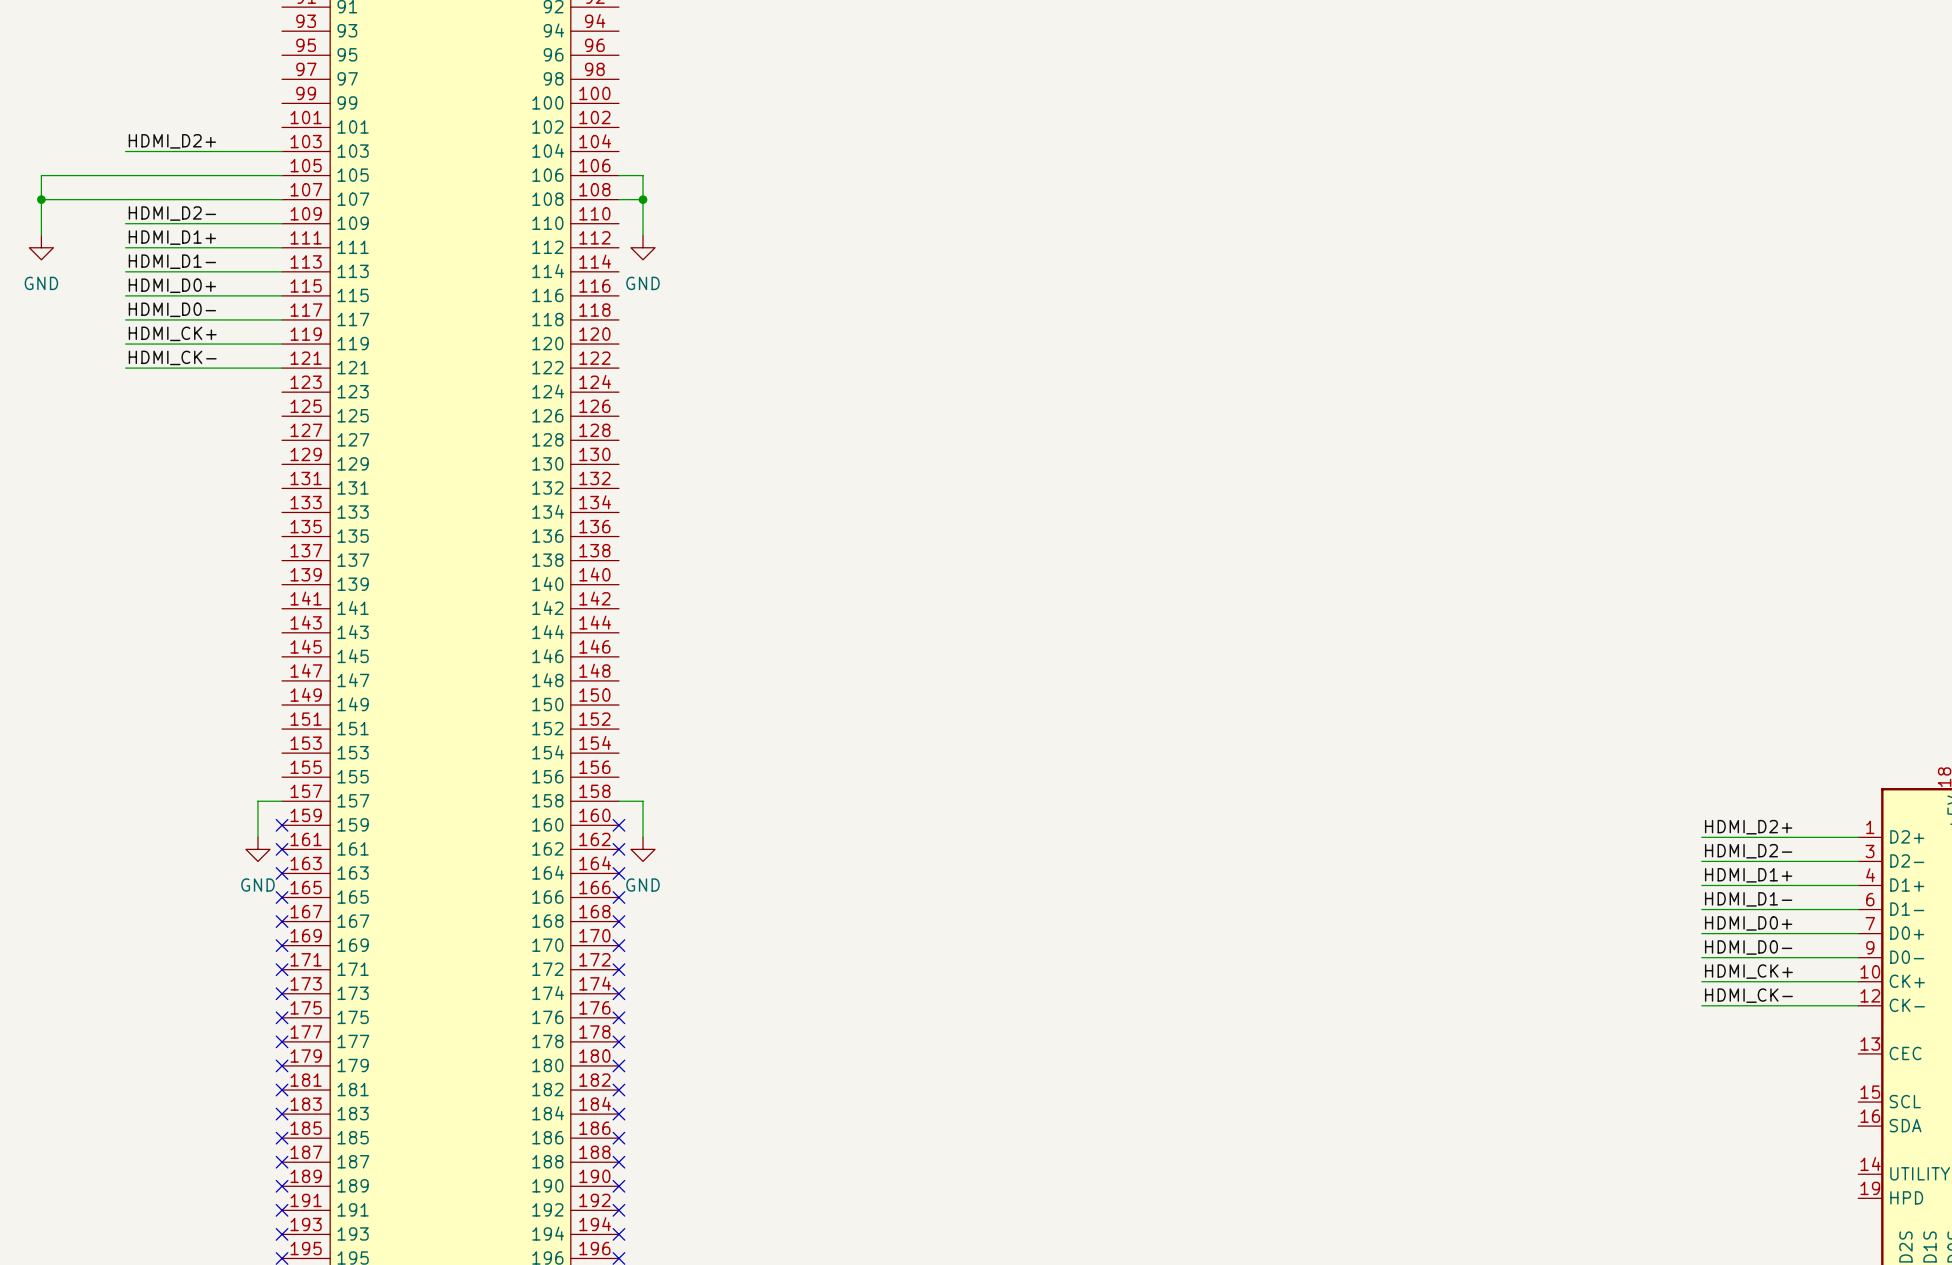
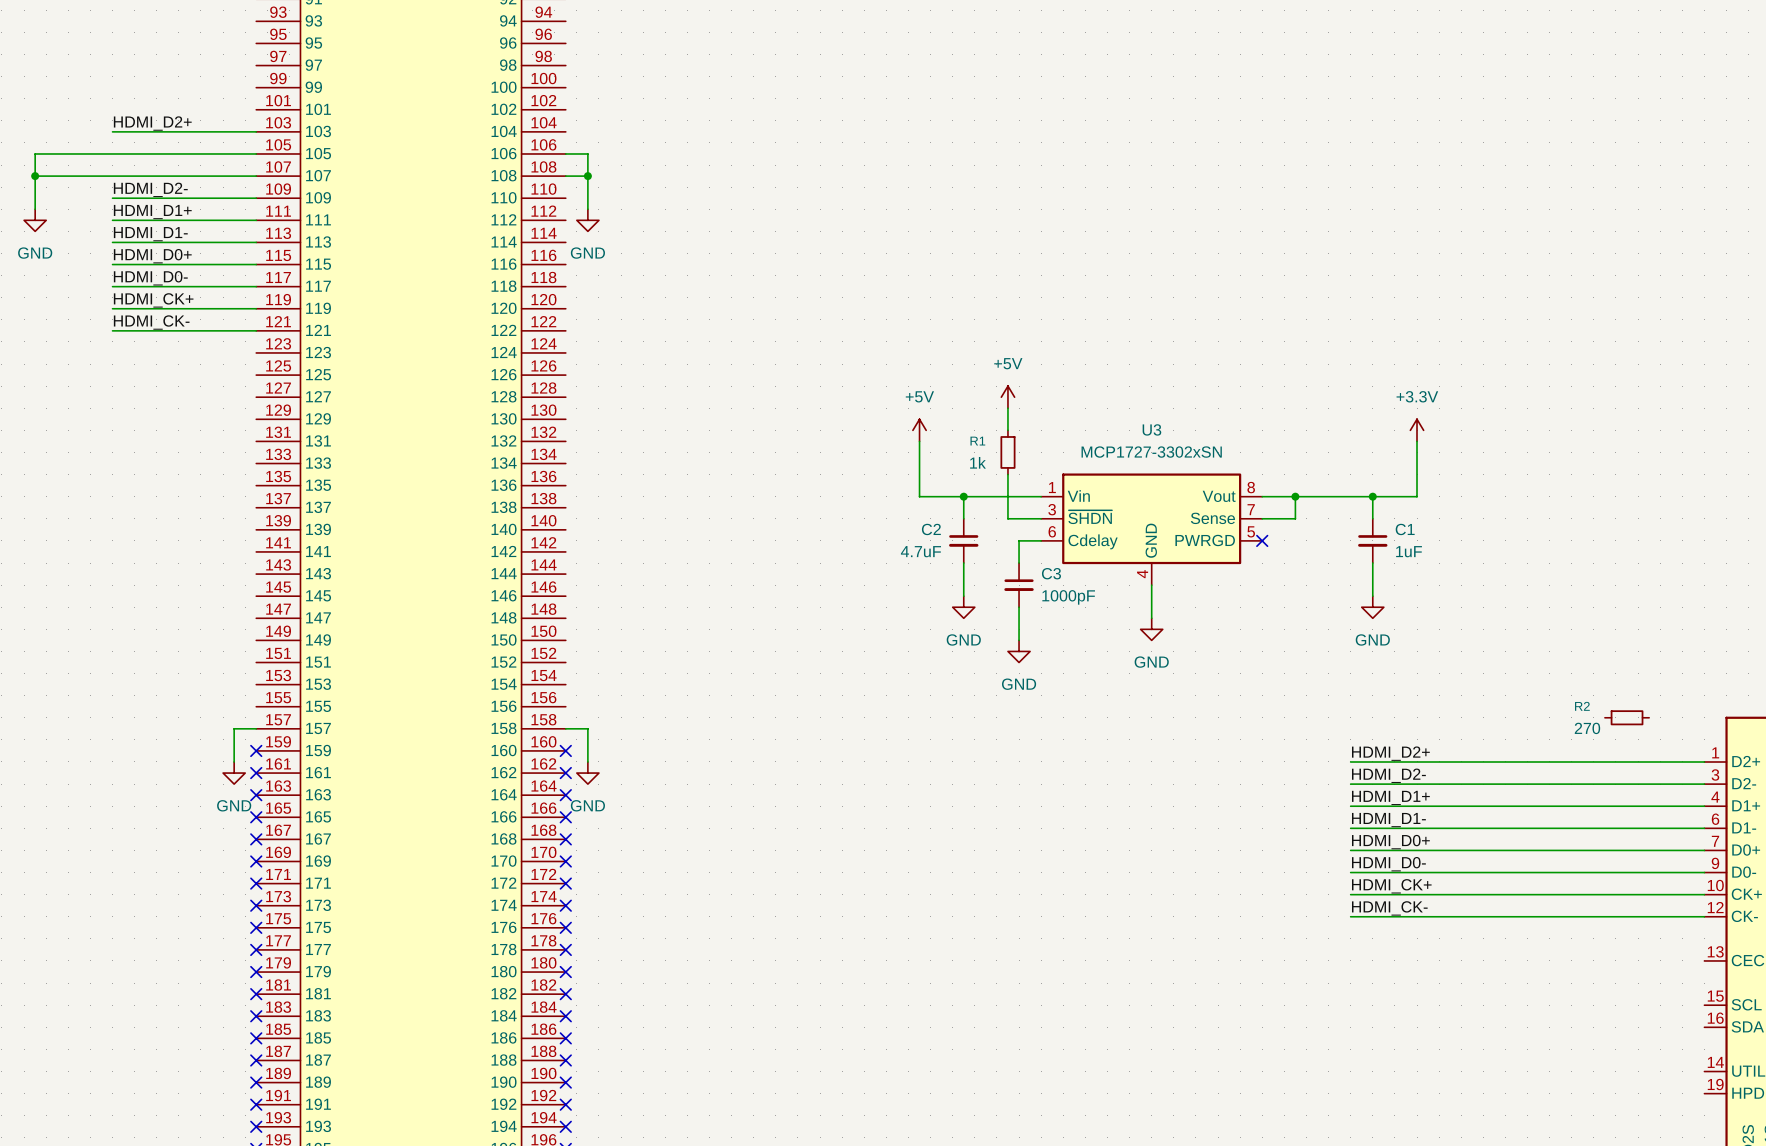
power symbol: none -> +5V (1007, 397)
wire: none -> (1007, 408) (1007, 430)
power symbol: none -> +5V (919, 430)
power symbol: none -> +3.3V (1417, 430)
wire: none -> (919, 441) (919, 496) (1041, 496)
wire: none -> (1417, 441) (1417, 496) (1262, 496)
R1: none -> 1k (1007, 452)
wire: none -> (1007, 474) (1007, 518) (1041, 518)
wire: none -> (963, 496) (963, 518)
junction: none -> (963, 496)
wire: none -> (1295, 496) (1295, 518) (1262, 518)
junction: none -> (1295, 496)
wire: none -> (1372, 496) (1372, 518)
junction: none -> (1372, 496)
U3: none -> MCP1727-3302xSN (1151, 529)
C2: none -> 4.7uF (963, 540)
wire: none -> (1041, 540) (1019, 540) (1019, 563)
no-connect mark: none -> (1262, 540)
C1: none -> 1uF (1372, 540)
wire: none -> (963, 563) (963, 596)
wire: none -> (1372, 563) (1372, 596)
C3: none -> 1000pF (1019, 585)
wire: none -> (1151, 585) (1151, 618)
power symbol: none -> GND (963, 607)
wire: none -> (1019, 607) (1019, 640)
power symbol: none -> GND (1372, 607)
power symbol: none -> GND (1151, 629)
power symbol: none -> GND (1019, 651)
R2: none -> 270 (1627, 717)
label position: HDMI_D2+ (1748, 827) -> HDMI_D2+ (1390, 753)
wire: none -> (1350, 761) (1560, 761)
label position: HDMI_D2- (1748, 851) -> HDMI_D2- (1388, 775)
wire: none -> (1350, 784) (1560, 784)
label position: HDMI_D1+ (1748, 875) -> HDMI_D1+ (1390, 797)
wire: none -> (1350, 806) (1560, 806)
label position: HDMI_D1- (1748, 899) -> HDMI_D1- (1388, 820)
wire: none -> (1350, 828) (1560, 828)
label position: HDMI_D0+ (1748, 923) -> HDMI_D0+ (1390, 842)
wire: none -> (1350, 850) (1560, 850)
label position: HDMI_D0- (1748, 947) -> HDMI_D0- (1388, 864)
wire: none -> (1350, 872) (1560, 872)
label position: HDMI_CK+ (1748, 971) -> HDMI_CK+ (1391, 886)
wire: none -> (1350, 894) (1560, 894)
label position: HDMI_CK- (1748, 995) -> HDMI_CK- (1389, 908)
wire: none -> (1350, 916) (1560, 916)

